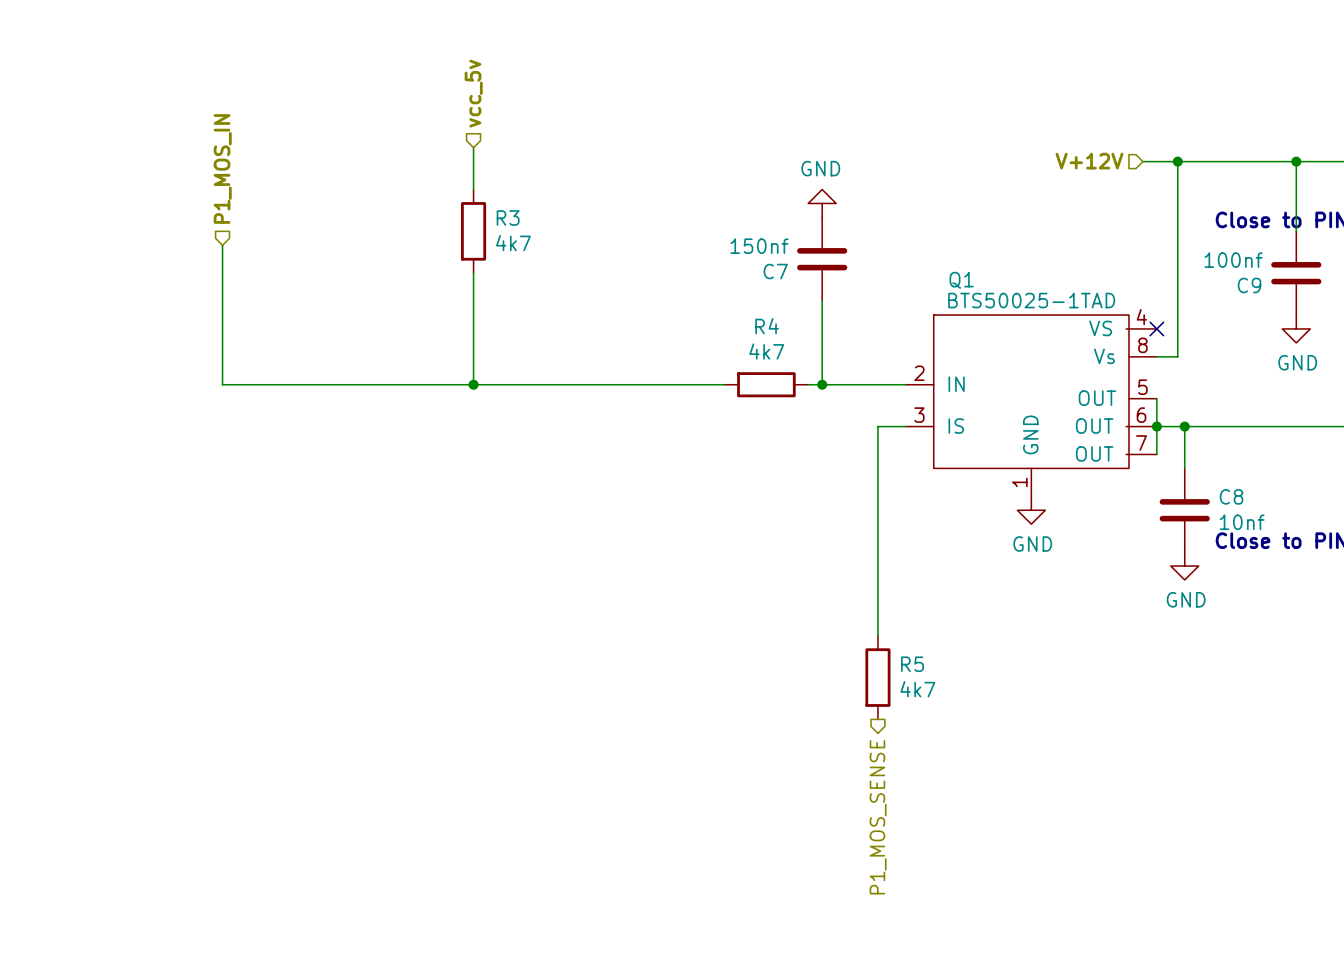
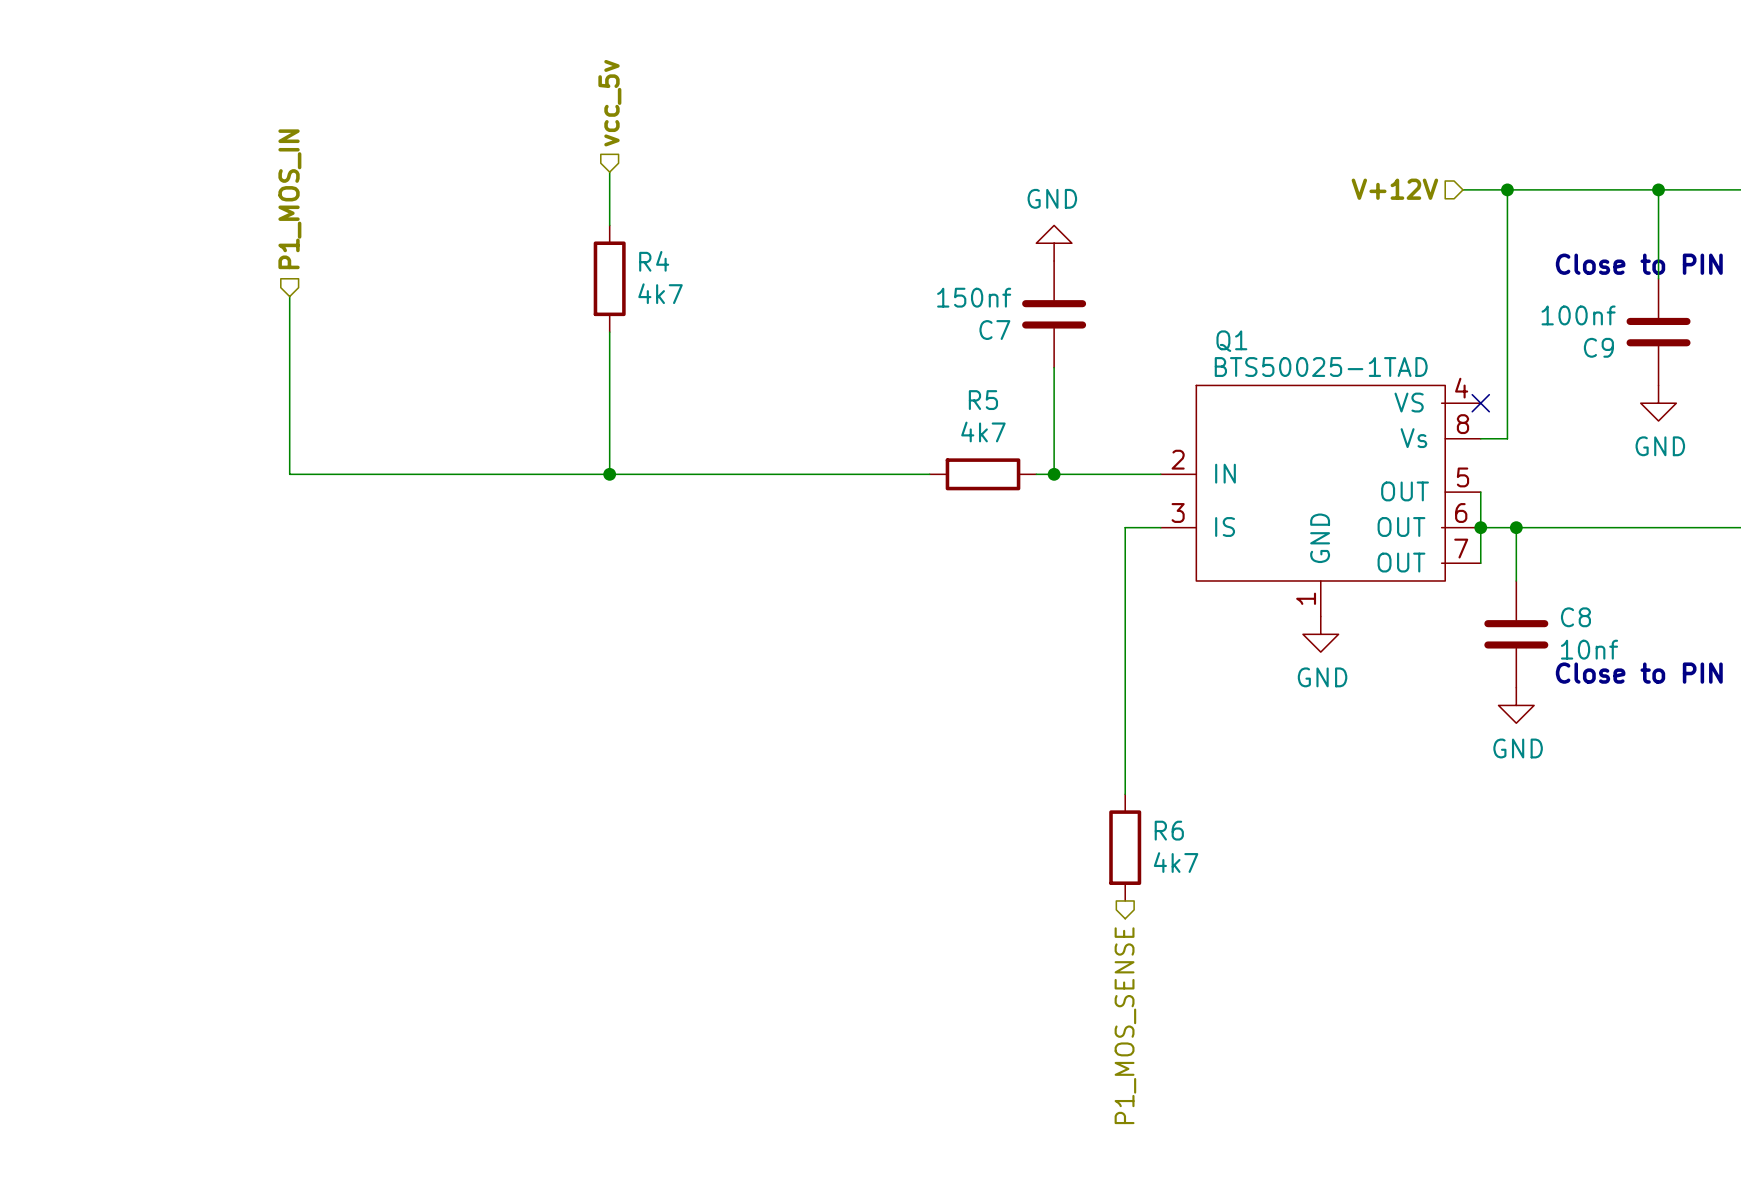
R3 name: R3 (508, 218) -> R4 (654, 261)
R4 name: R4 (767, 326) -> R5 (983, 400)
R5 name: R5 (912, 664) -> R6 (1169, 830)

